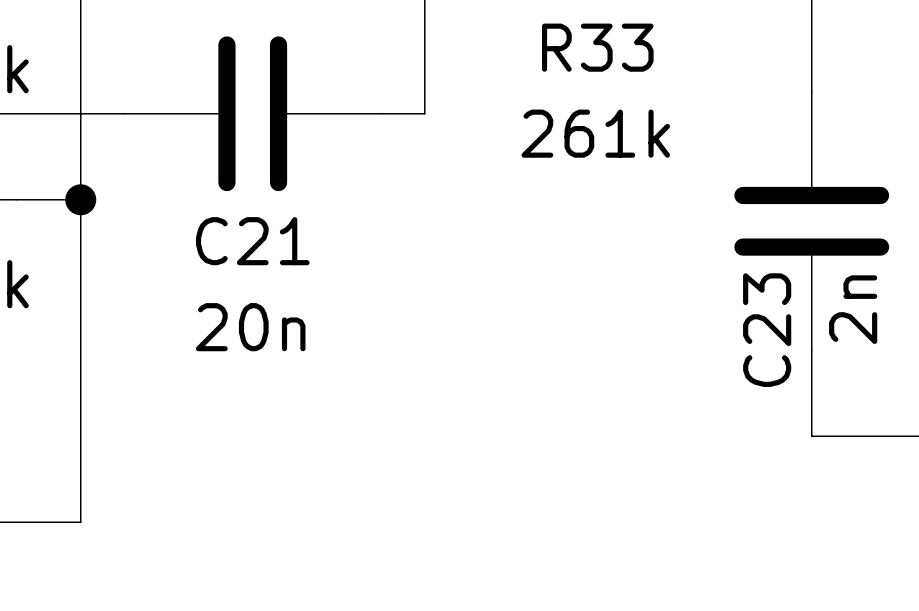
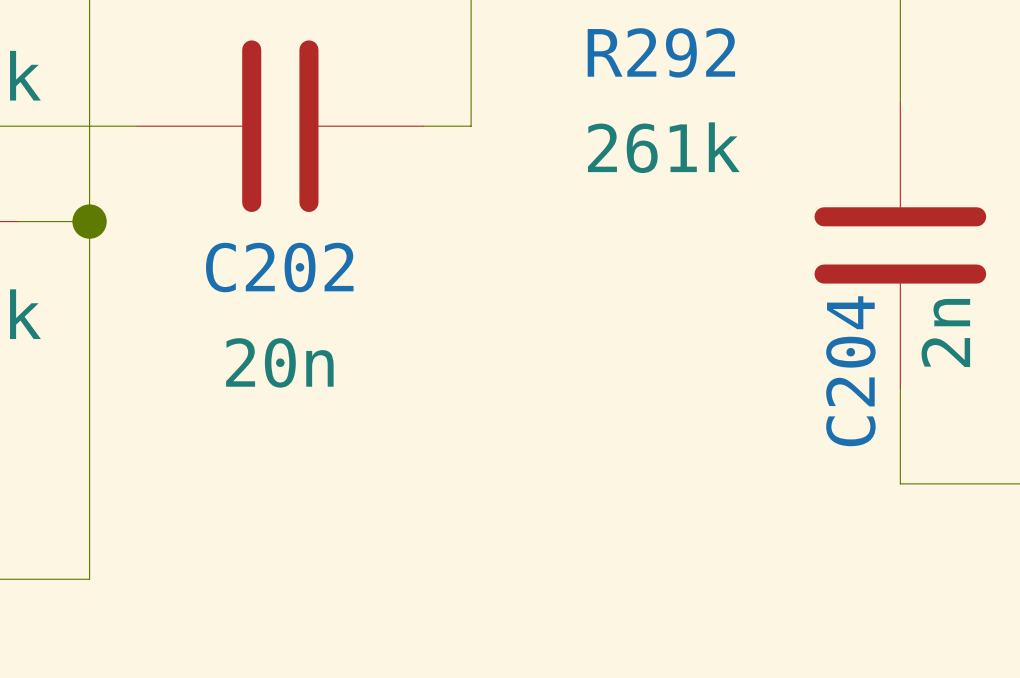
R33 name: R33 (597, 47) -> R292 (661, 52)
C21 name: C21 (252, 241) -> C202 (279, 267)
C23 name: C23 (767, 330) -> C204 (850, 371)

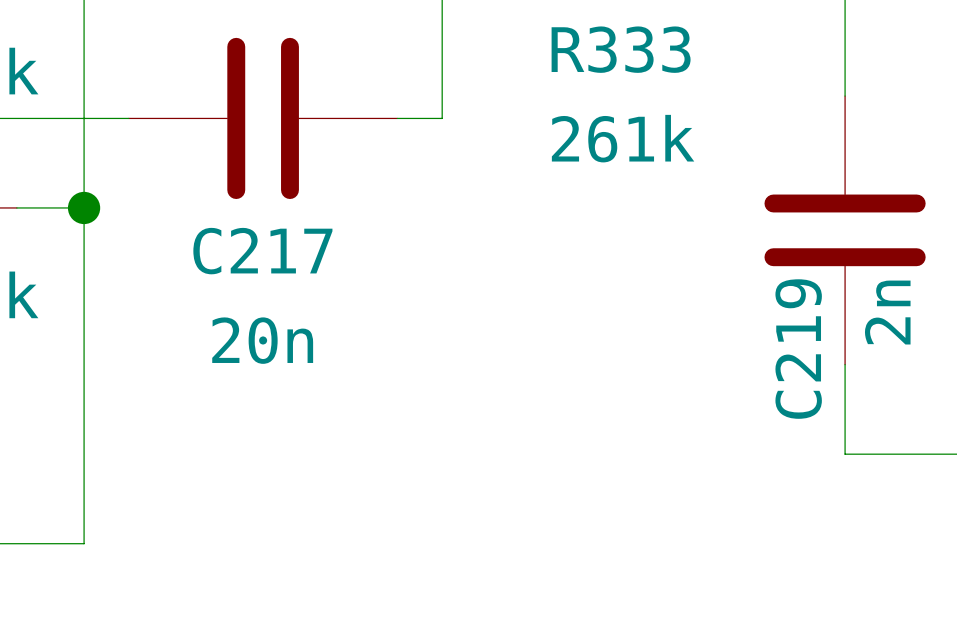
R292 name: R292 (661, 52) -> R333 (621, 49)
C202 name: C202 (279, 267) -> C217 (262, 251)
C204 name: C204 (850, 371) -> C219 (798, 349)

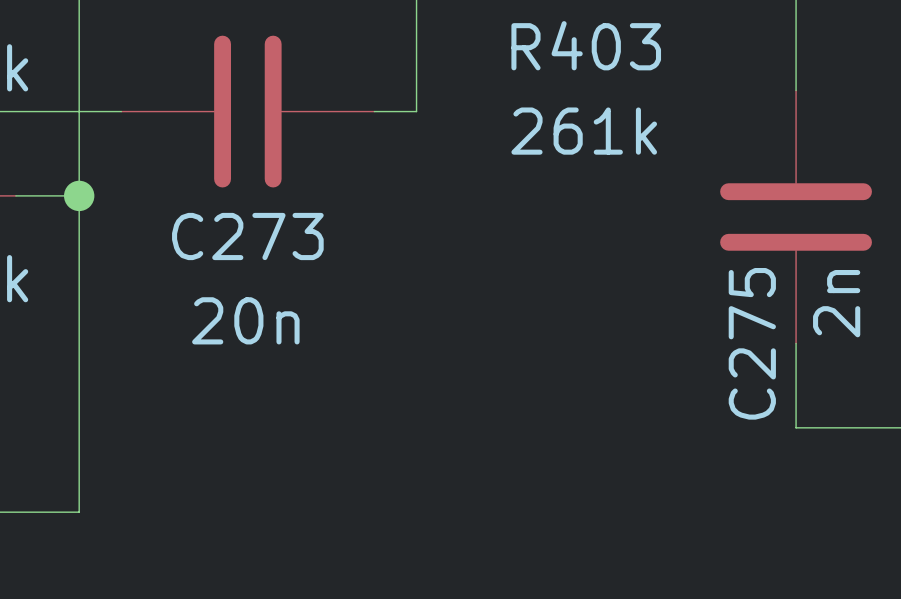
R333 name: R333 (621, 49) -> R403 (586, 45)
C217 name: C217 (262, 251) -> C273 (247, 236)
C219 name: C219 (798, 349) -> C275 (752, 343)

